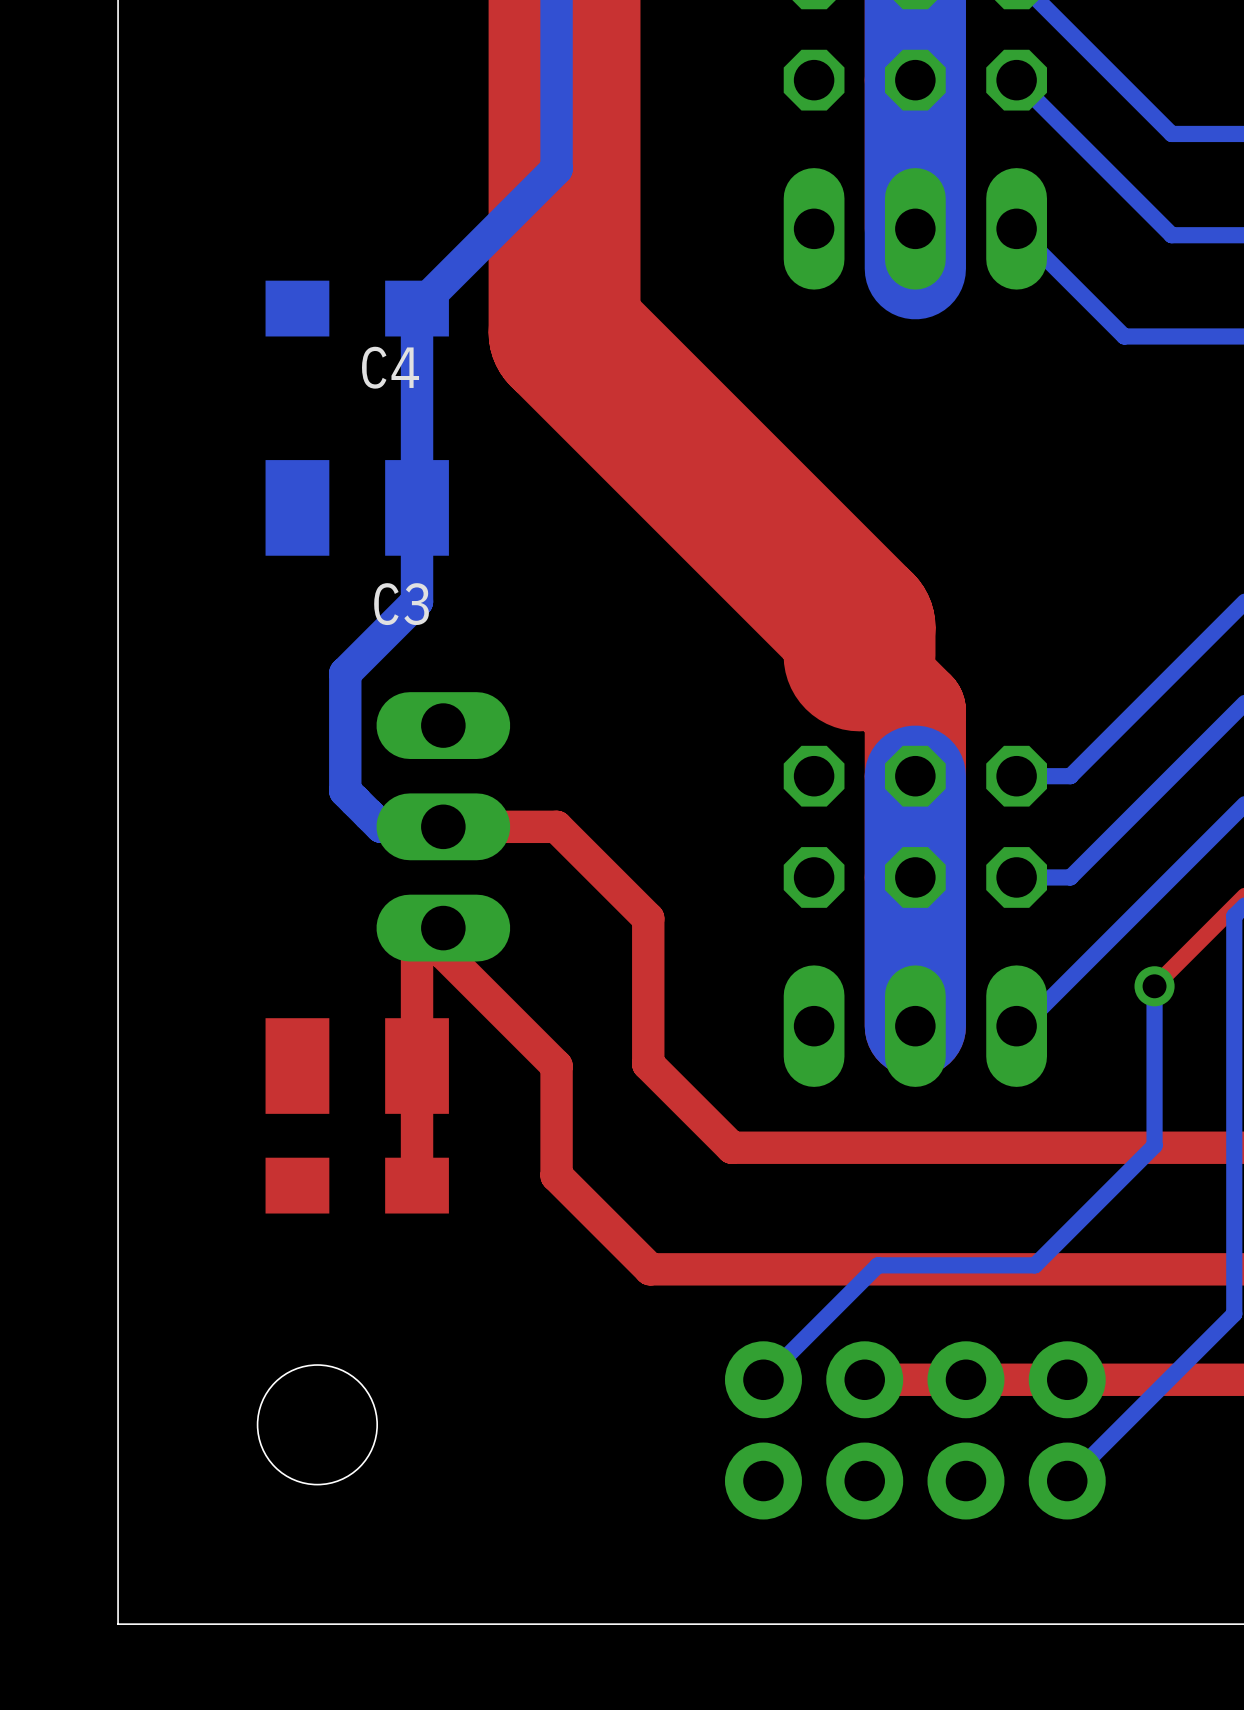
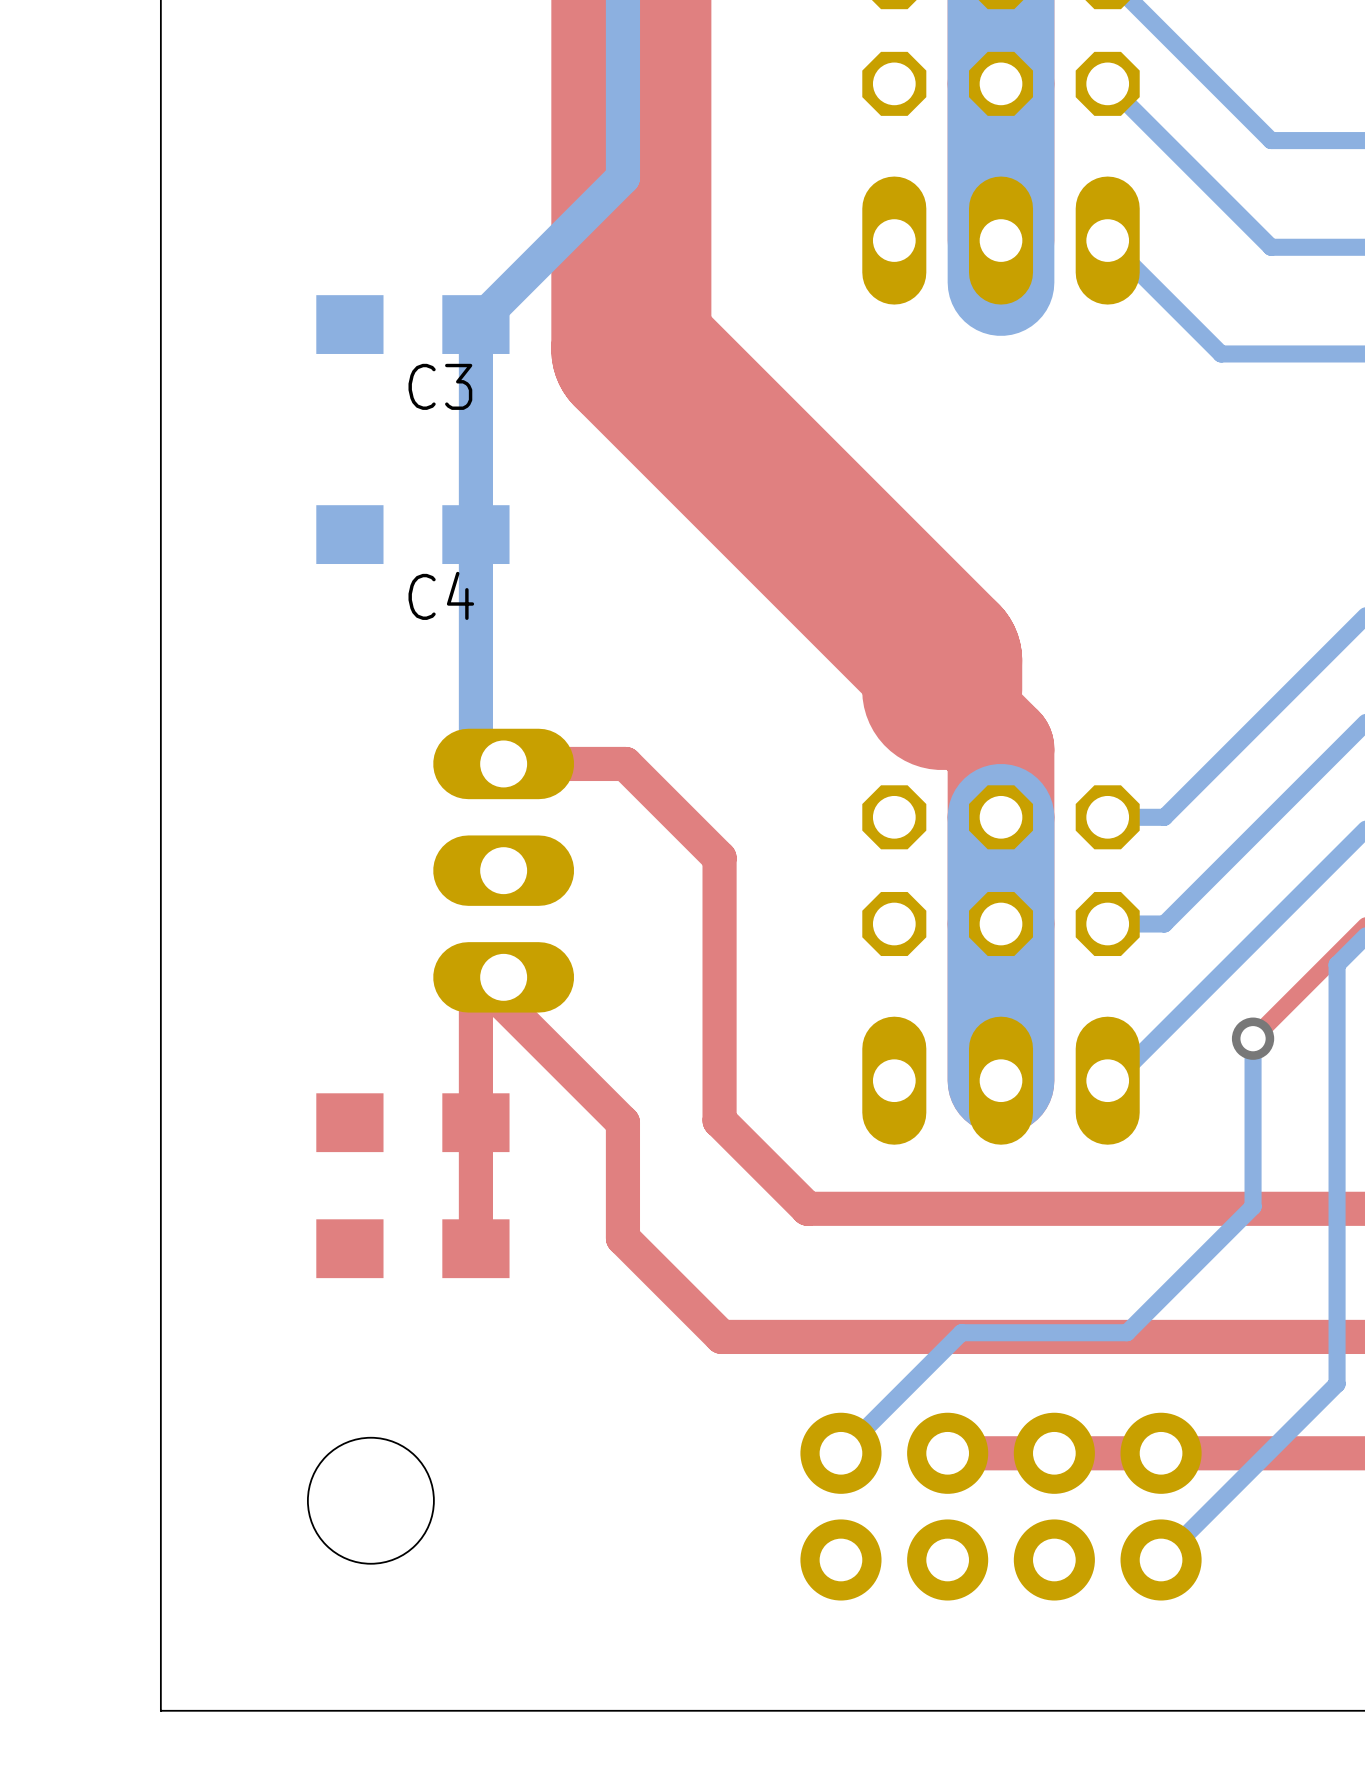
C4 name: C4 (390, 367) -> C3 (440, 386)
C3: (357, 507) -> none
C4: none -> (412, 534)
bottom track: (417, 601) (345, 673) (345, 790) (381, 826) (443, 826) -> (475, 633) (475, 736) (503, 763)
top track: (443, 826) (556, 826) (648, 918) -> (503, 763) (625, 763) (719, 858) (719, 967)
part footprint: [265, 1018, 449, 1114] -> [316, 1093, 510, 1153]

